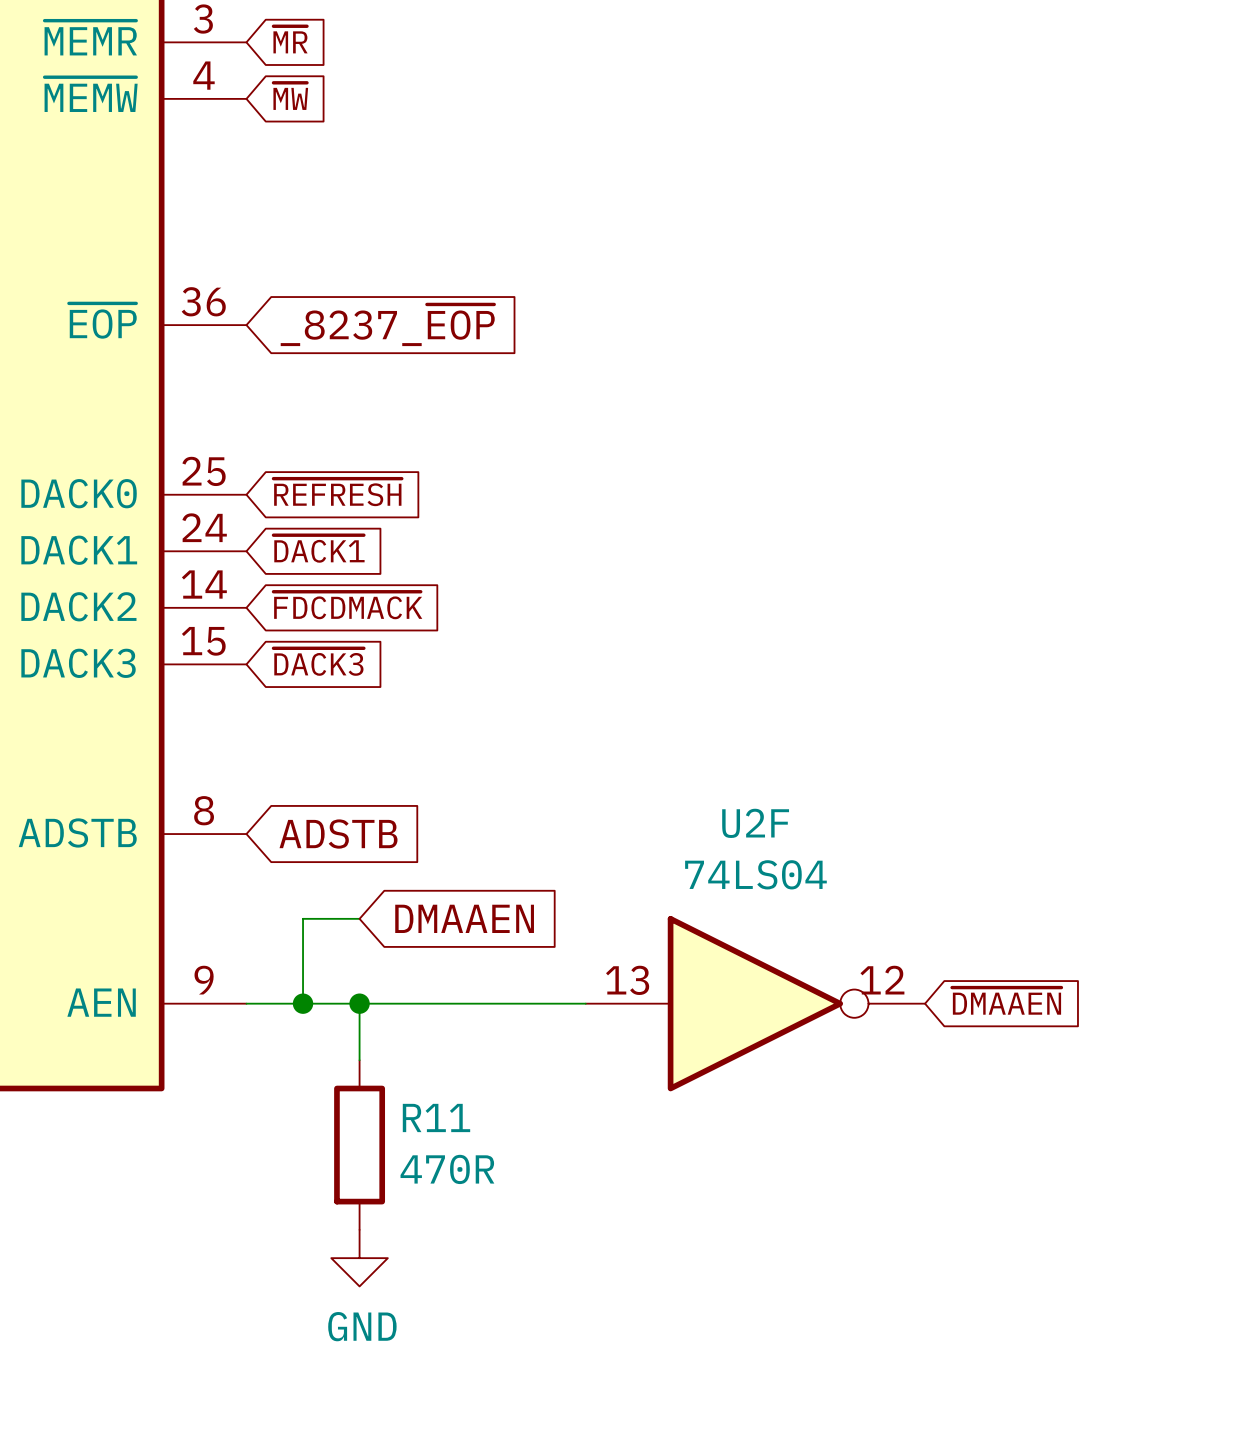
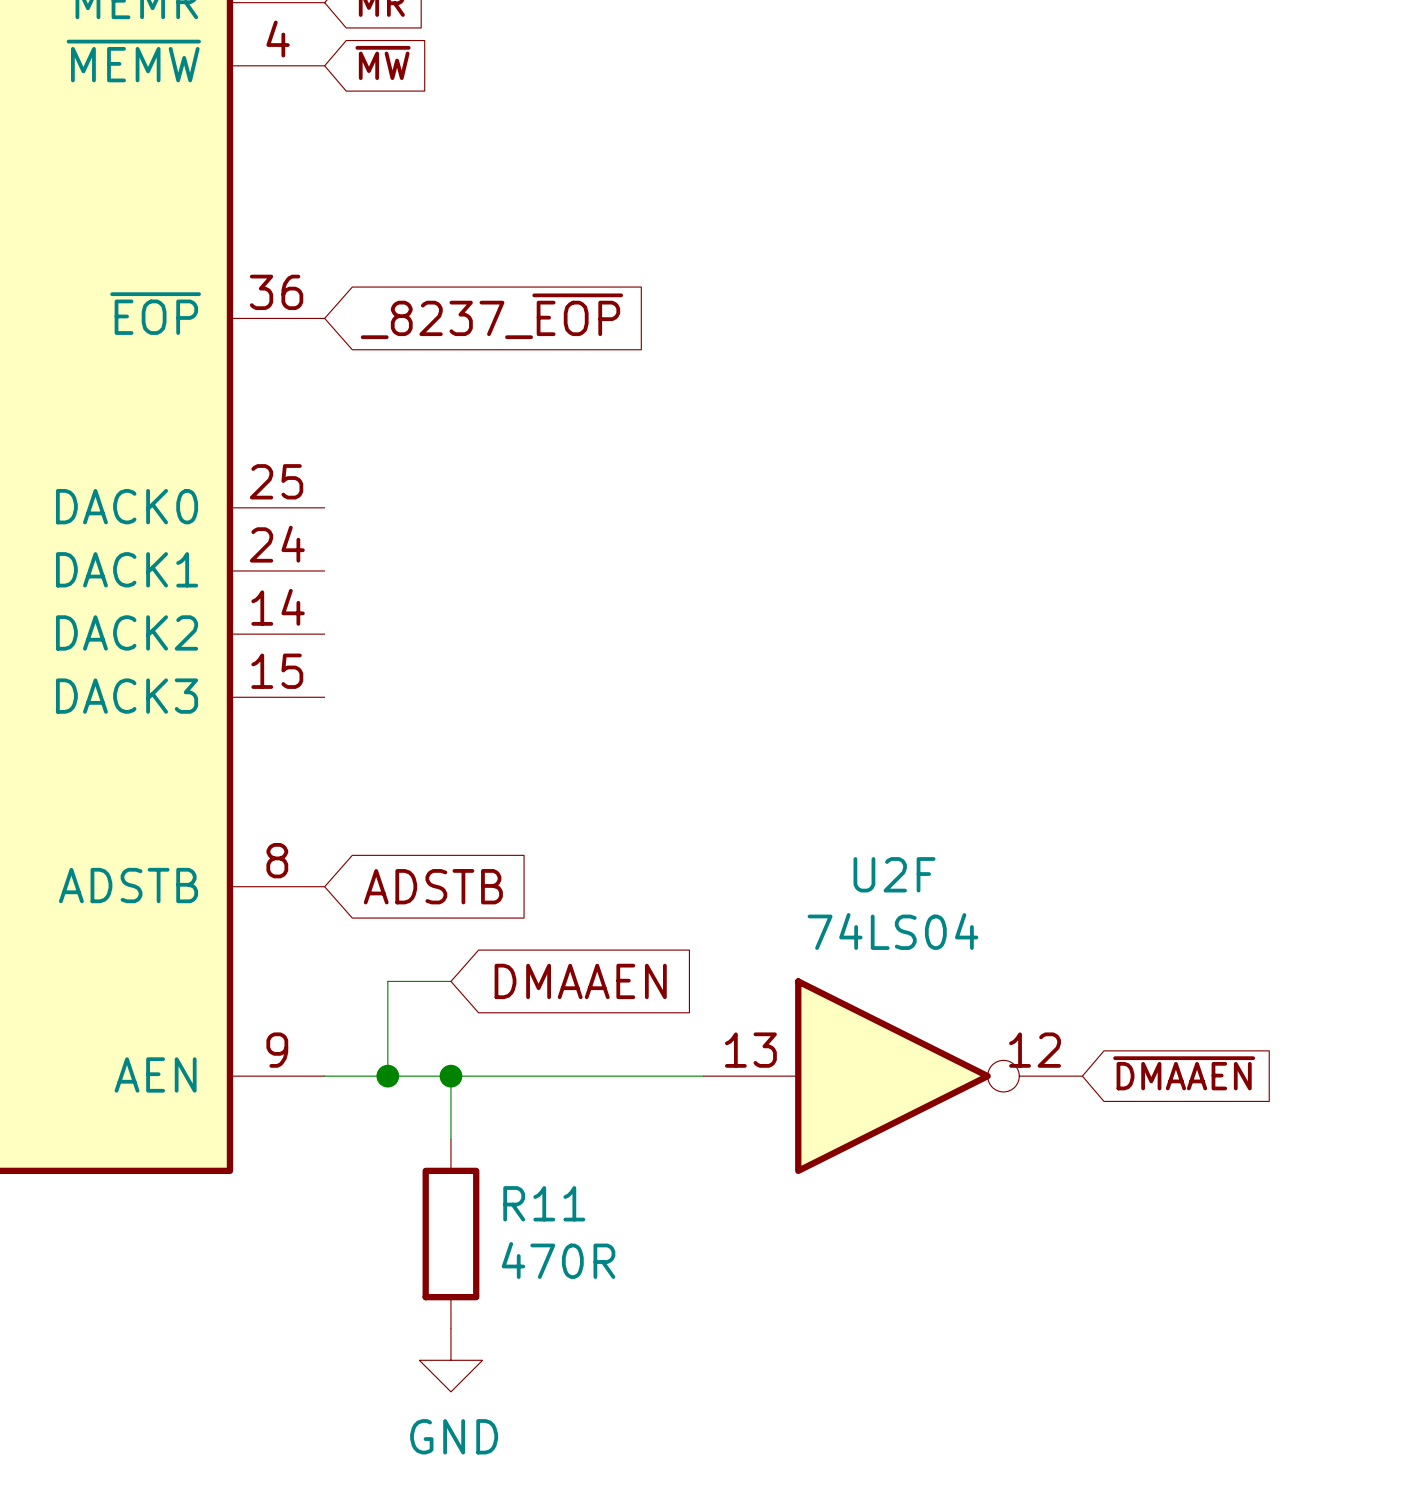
global label: ~{REFRESH} (337, 492) -> none
global label: ~{DACK1} (319, 548) -> none
global label: ~{FDCDMACK} (347, 605) -> none
global label: ~{DACK3} (318, 662) -> none

